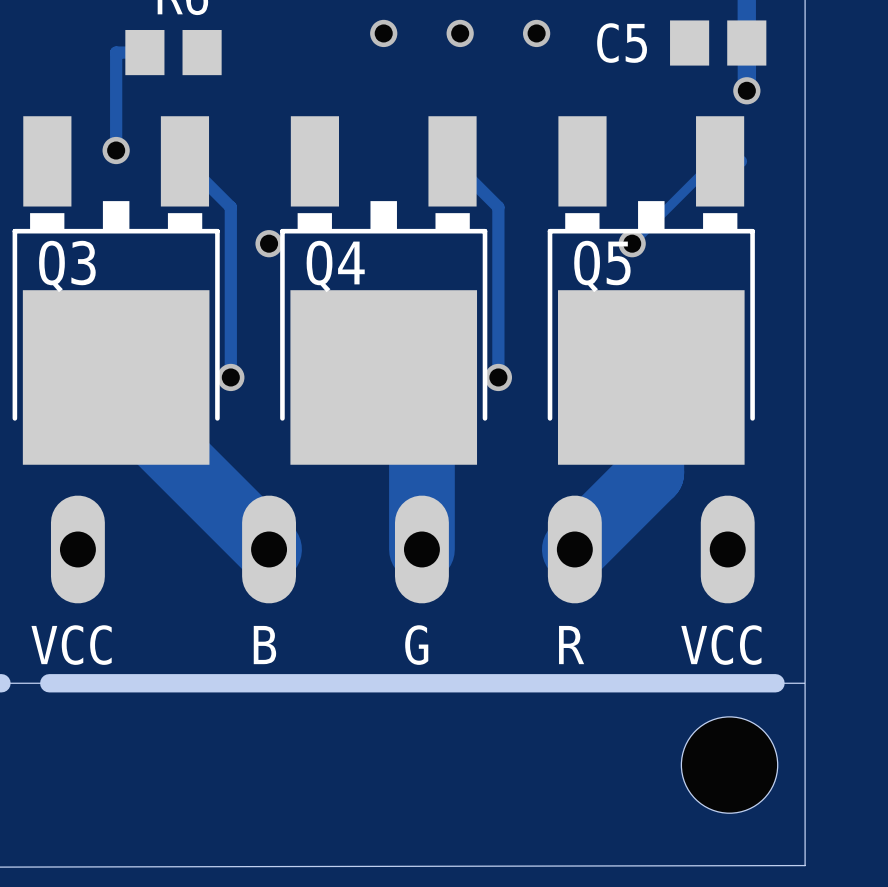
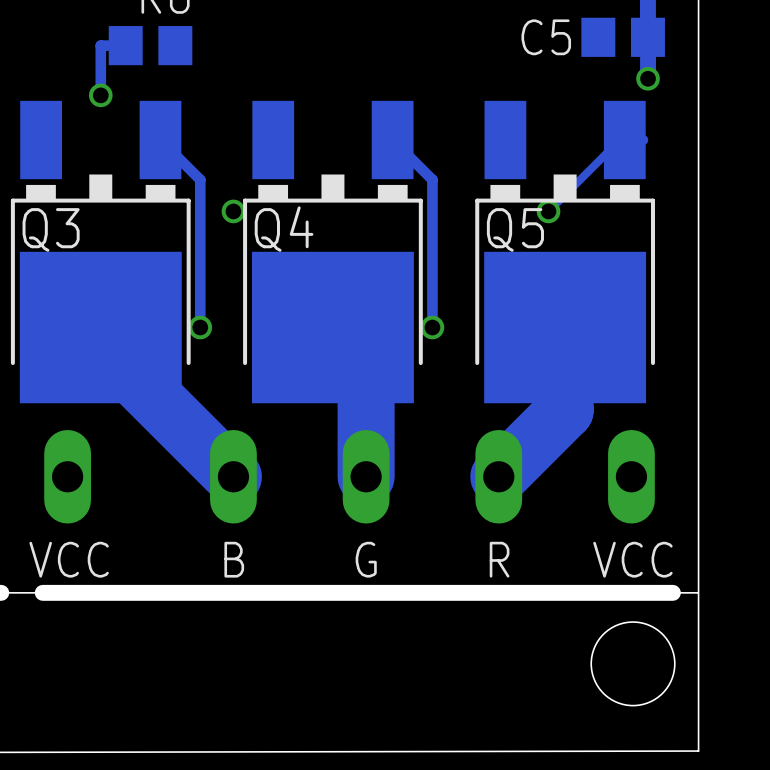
via: (383, 33) -> none
via: (460, 33) -> none
via: (536, 33) -> none
track: (116, 109) (116, 150) -> none
via position: (116, 150) -> (100, 95)

